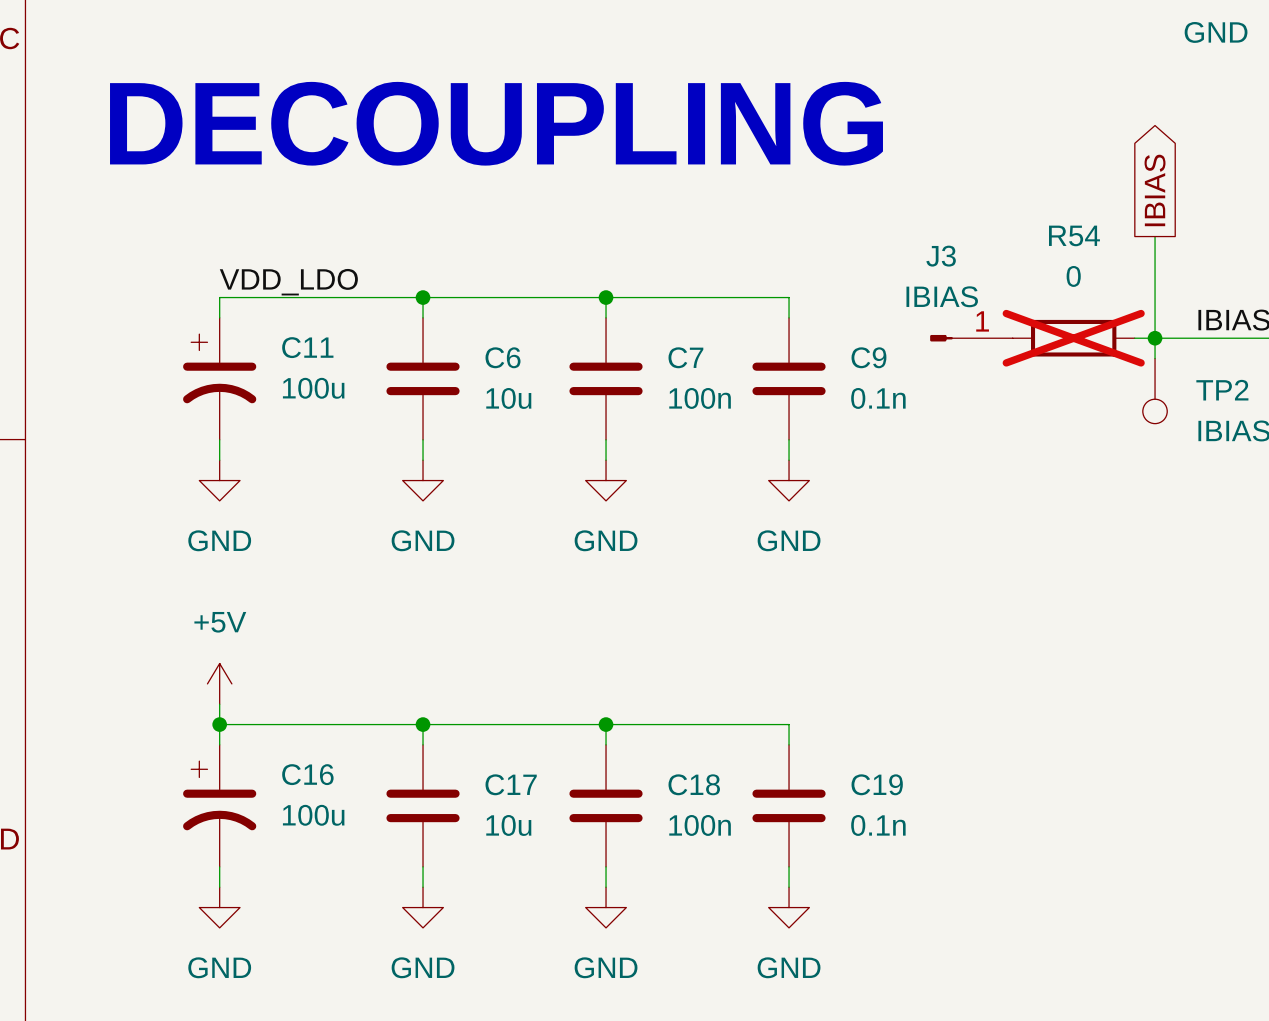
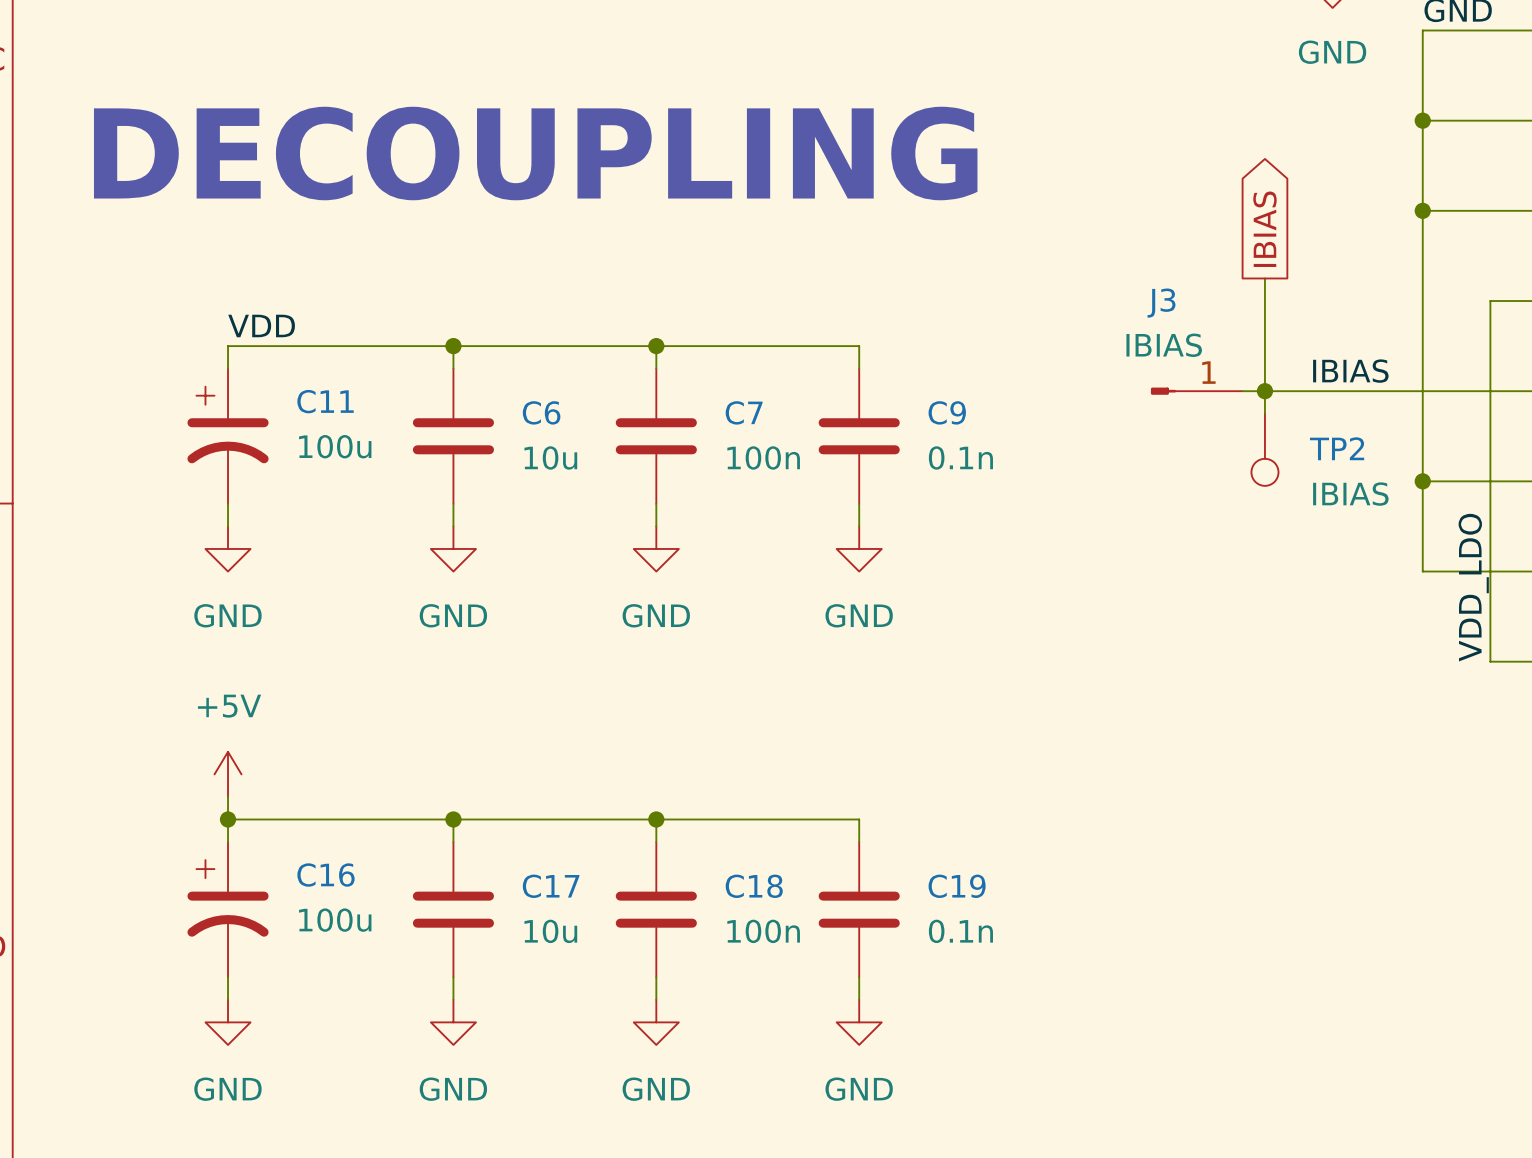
label: VDD_LDO (288, 282) -> VDD (261, 325)
J3 position: (971, 338) -> (1196, 391)
R54: 0 (1073, 338) -> none

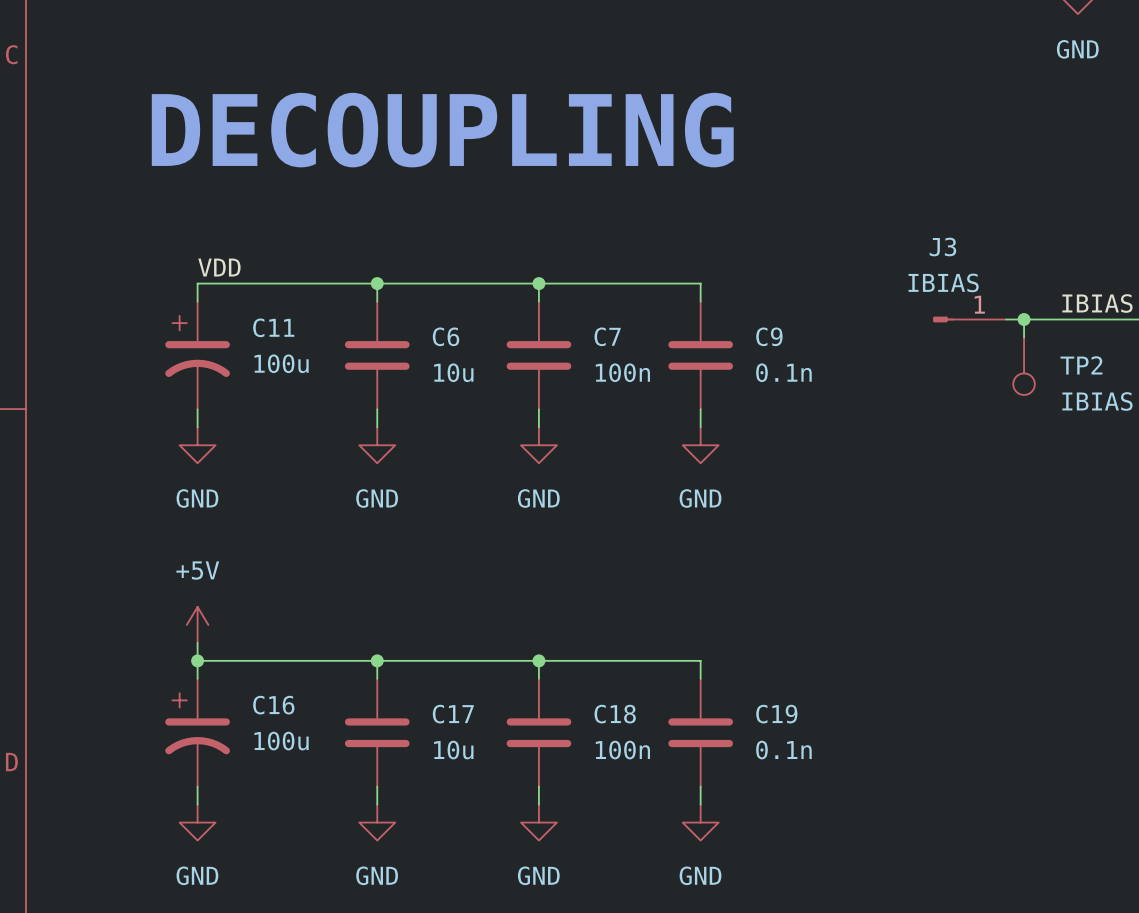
global label: IBIAS (1264, 229) -> none
wire: (1264, 278) (1264, 391) -> none

